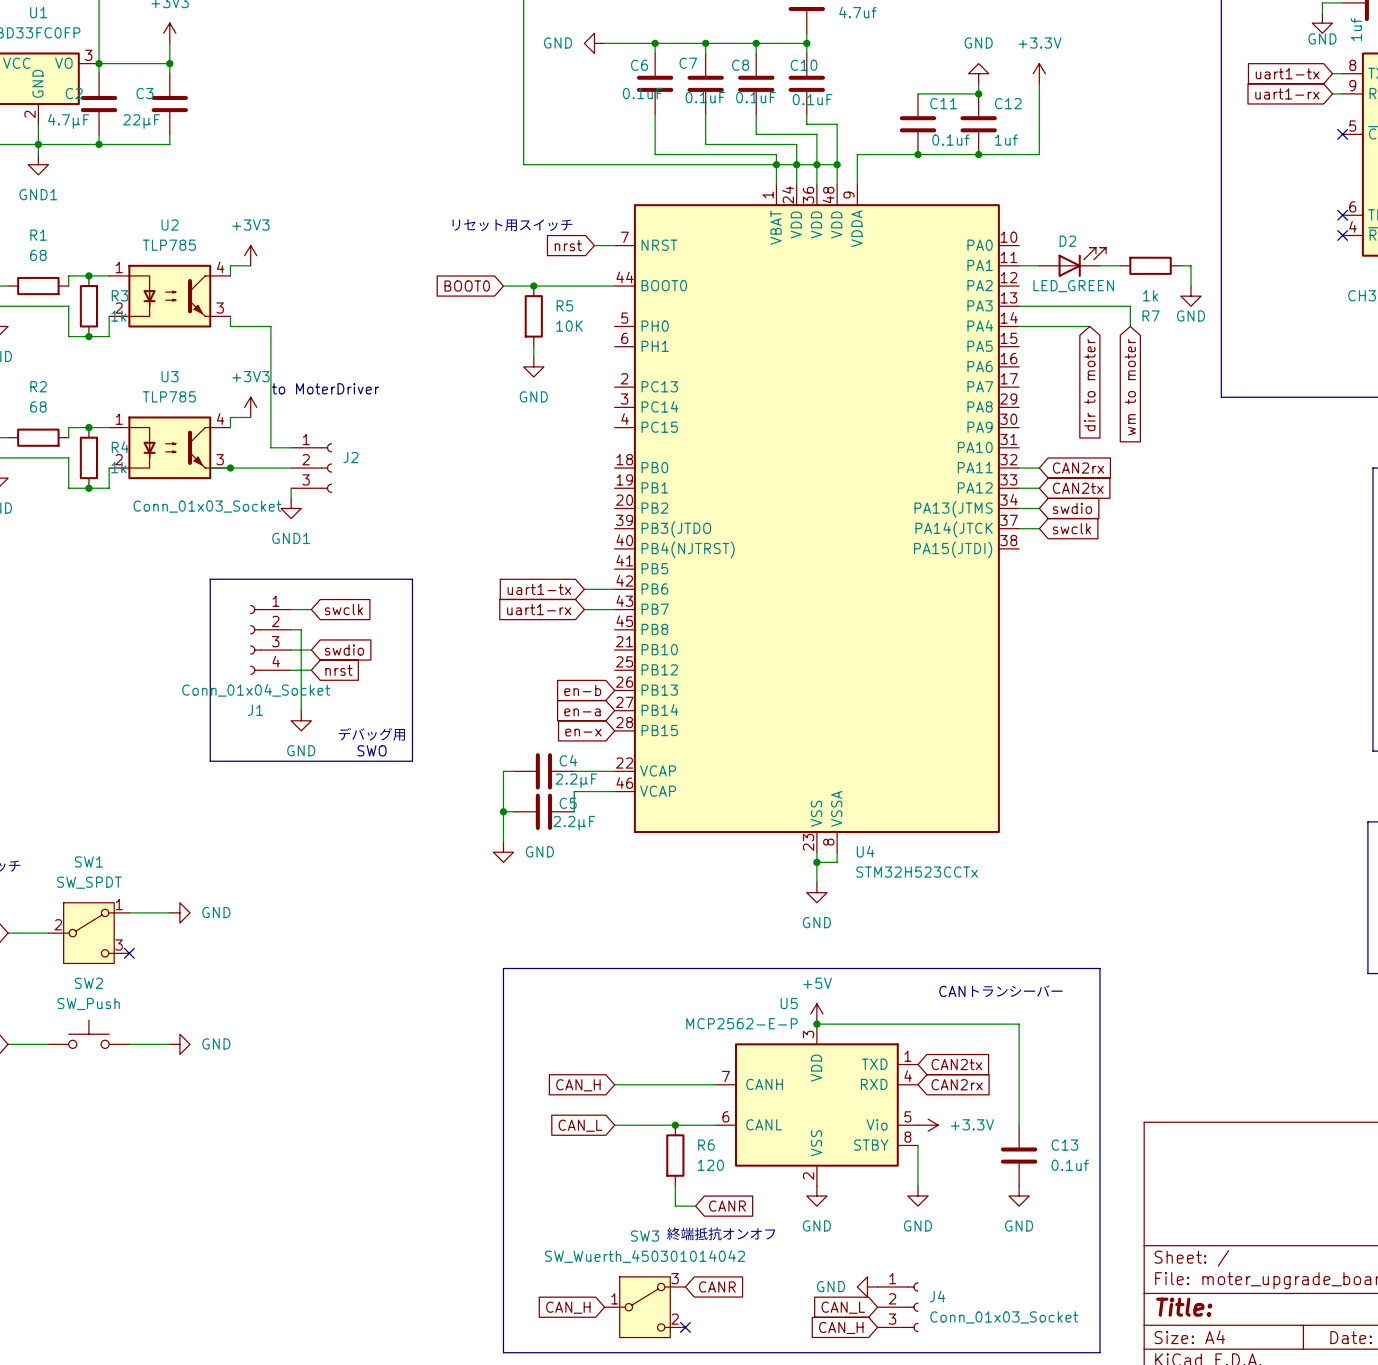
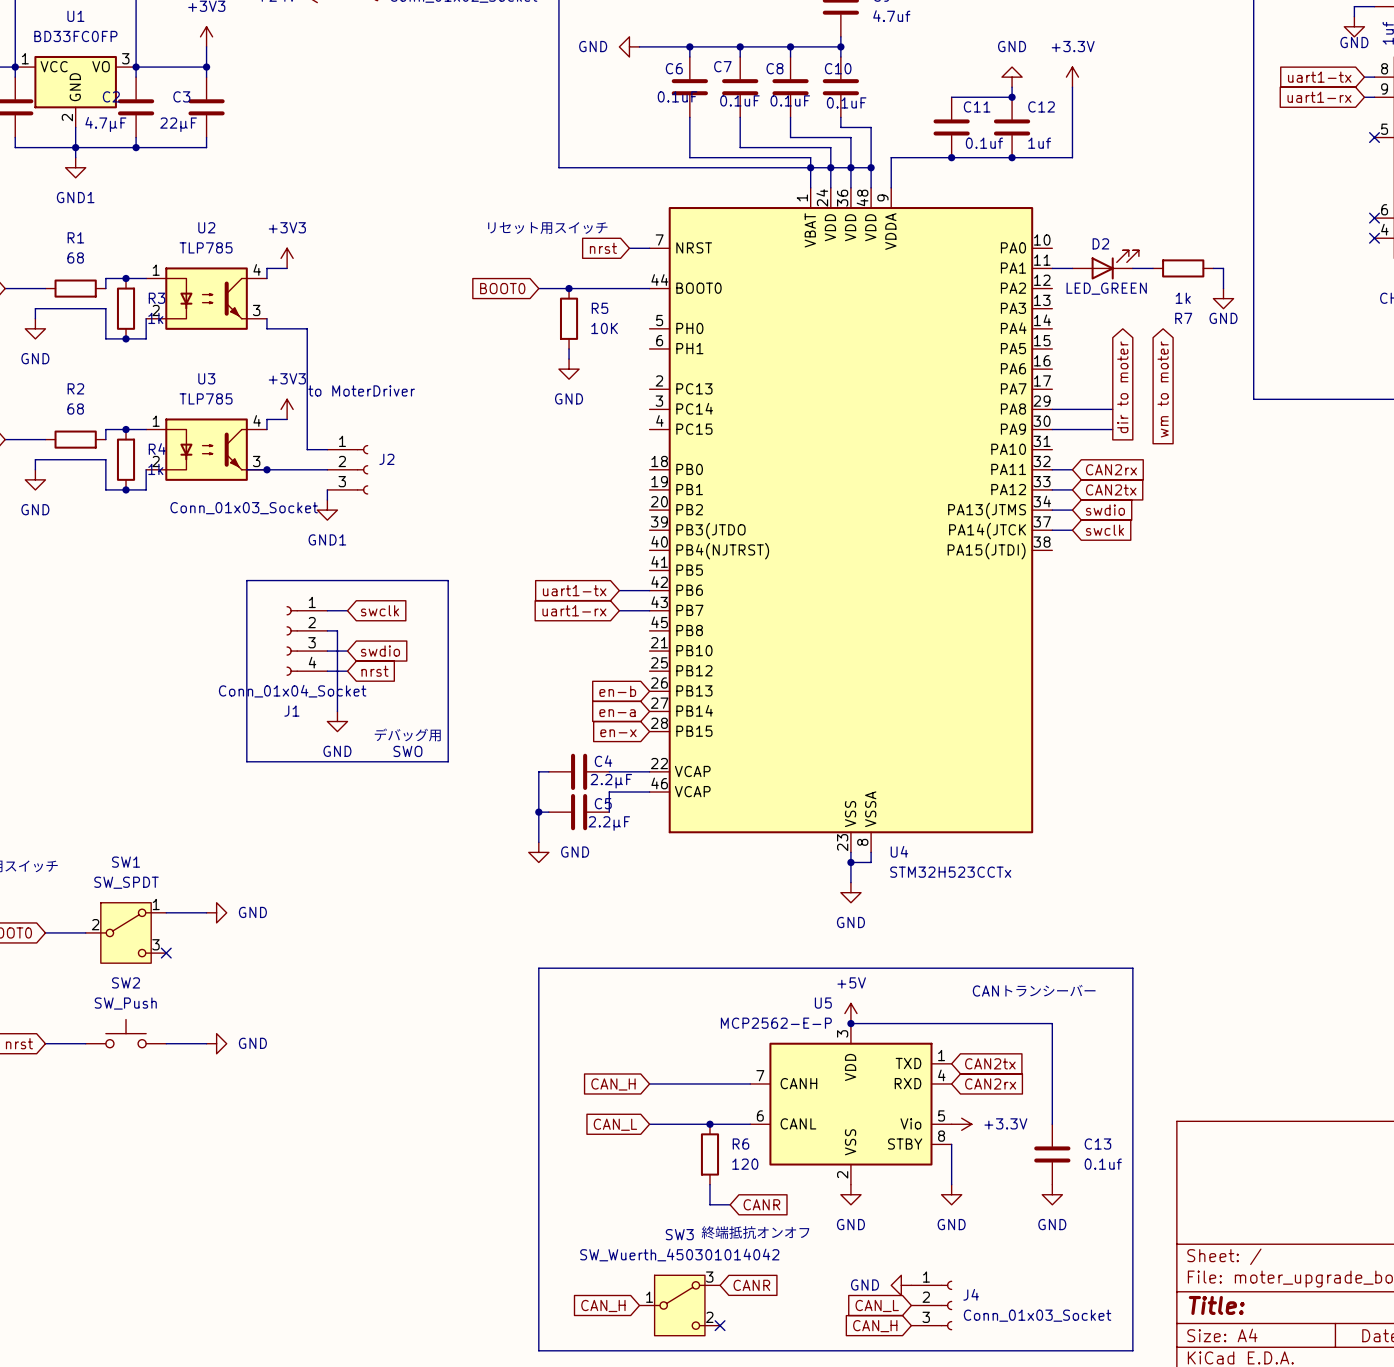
wire: (1019, 306) (1130, 306) (1130, 326) -> none
wire: (1019, 326) (1089, 326) -> none
wire: none -> (1052, 409) (1112, 409)
wire: none -> (1052, 429) (1112, 429)

